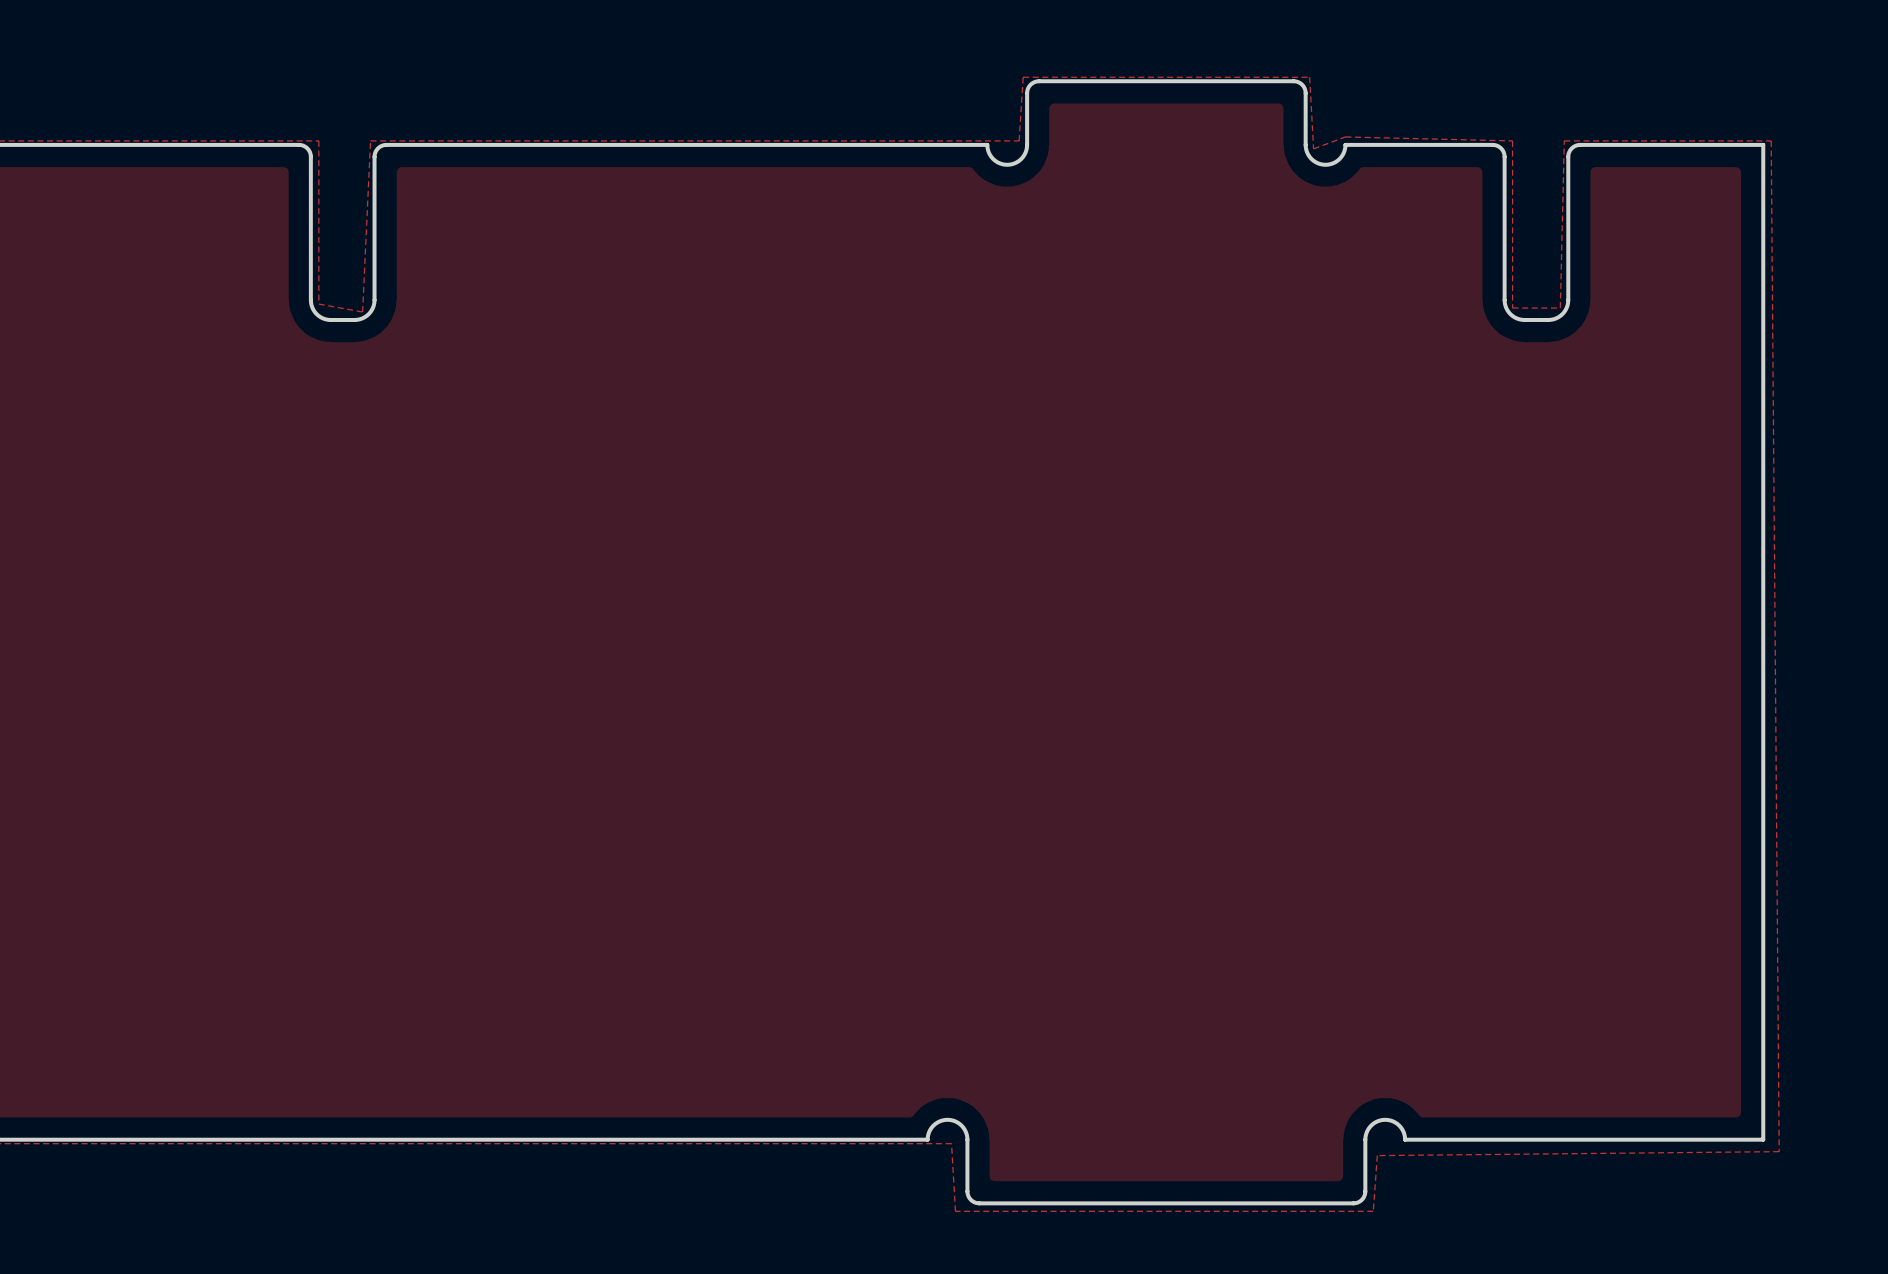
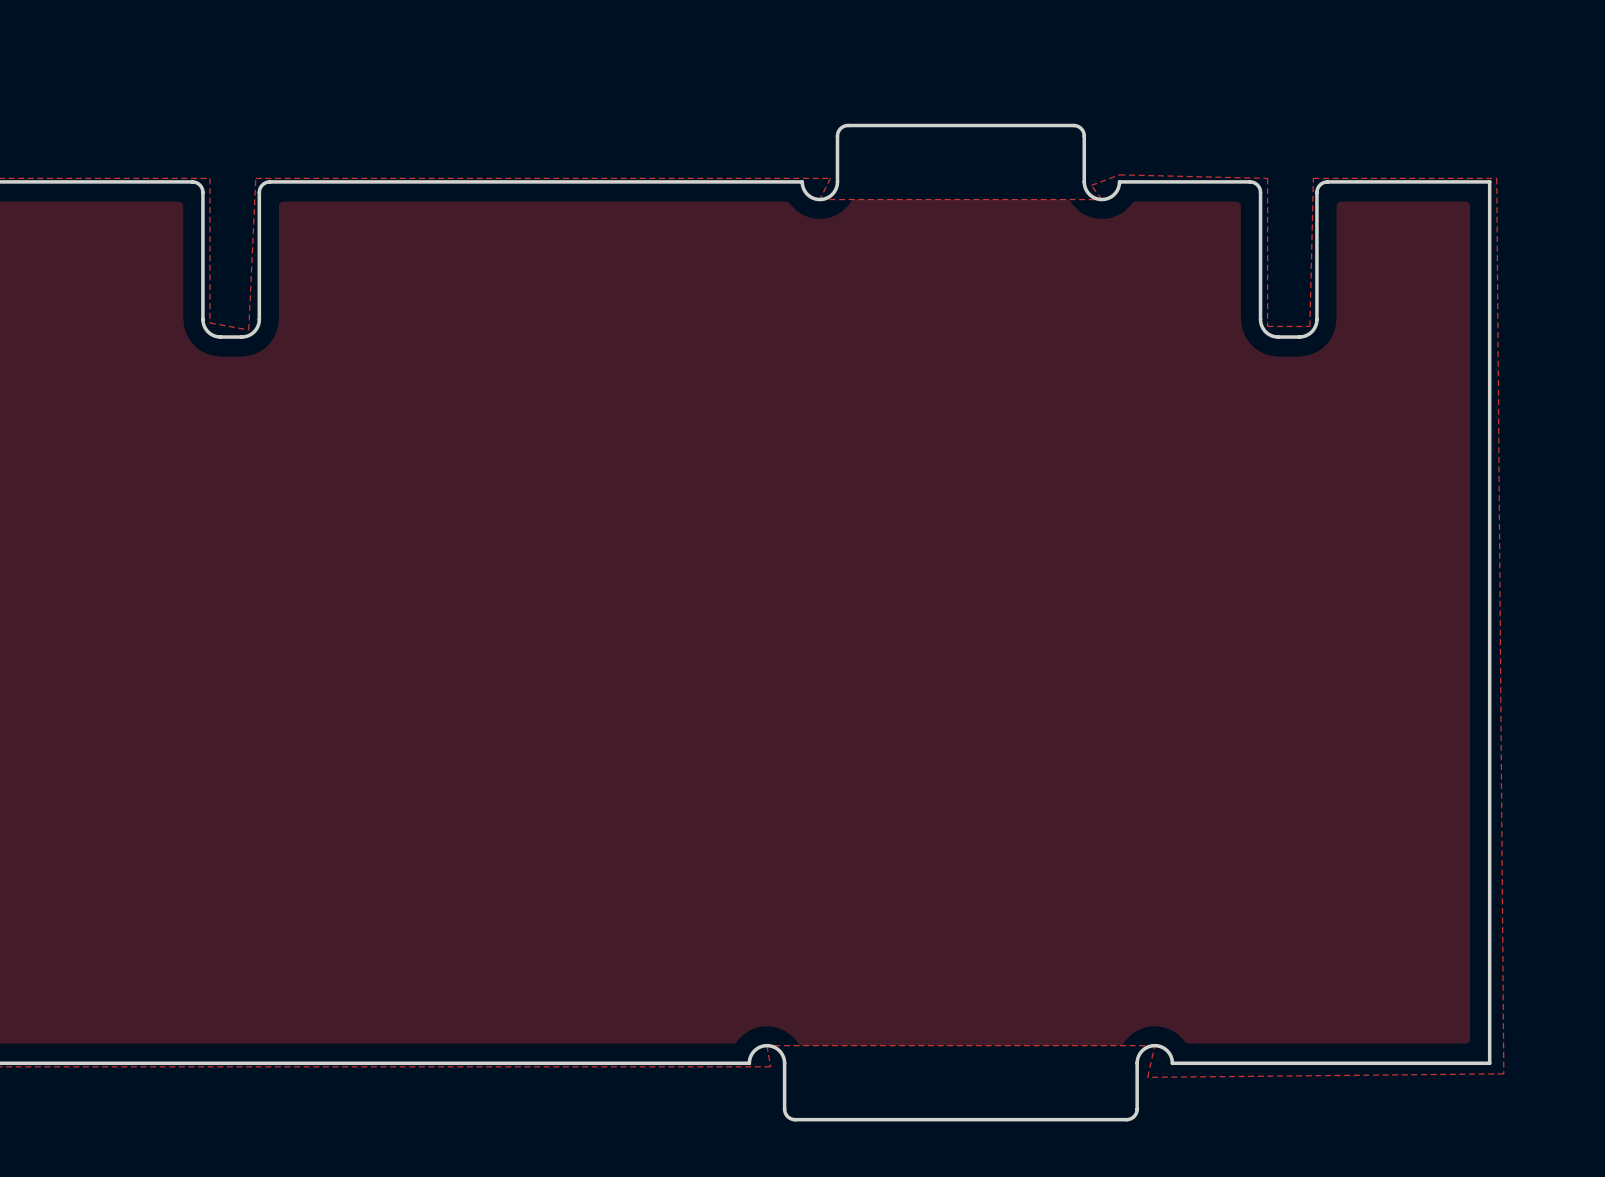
zone outline: (1019, 140) (1023, 77) (1309, 77) (1313, 148) -> (830, 178) (819, 199) (1101, 199) (1091, 185)
zone outline: (951, 1143) (955, 1211) (1373, 1211) (1377, 1155) -> (770, 1066) (766, 1045) (1154, 1045) (1147, 1077)

